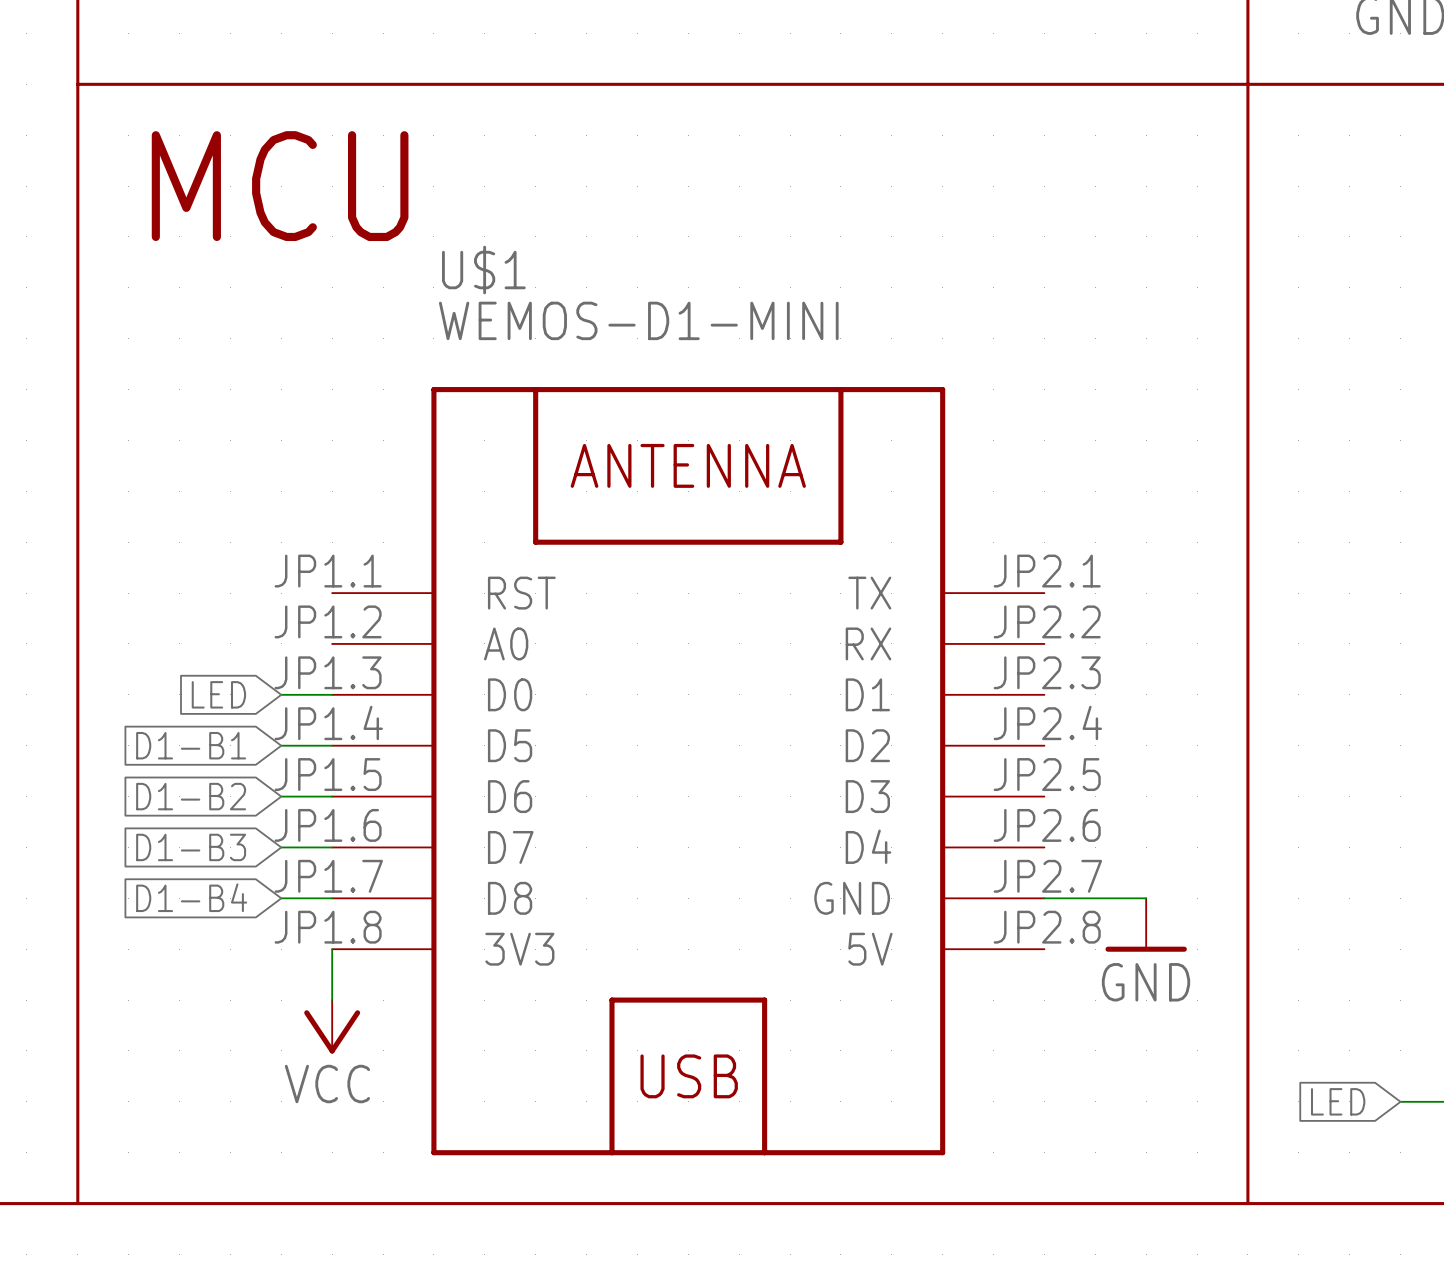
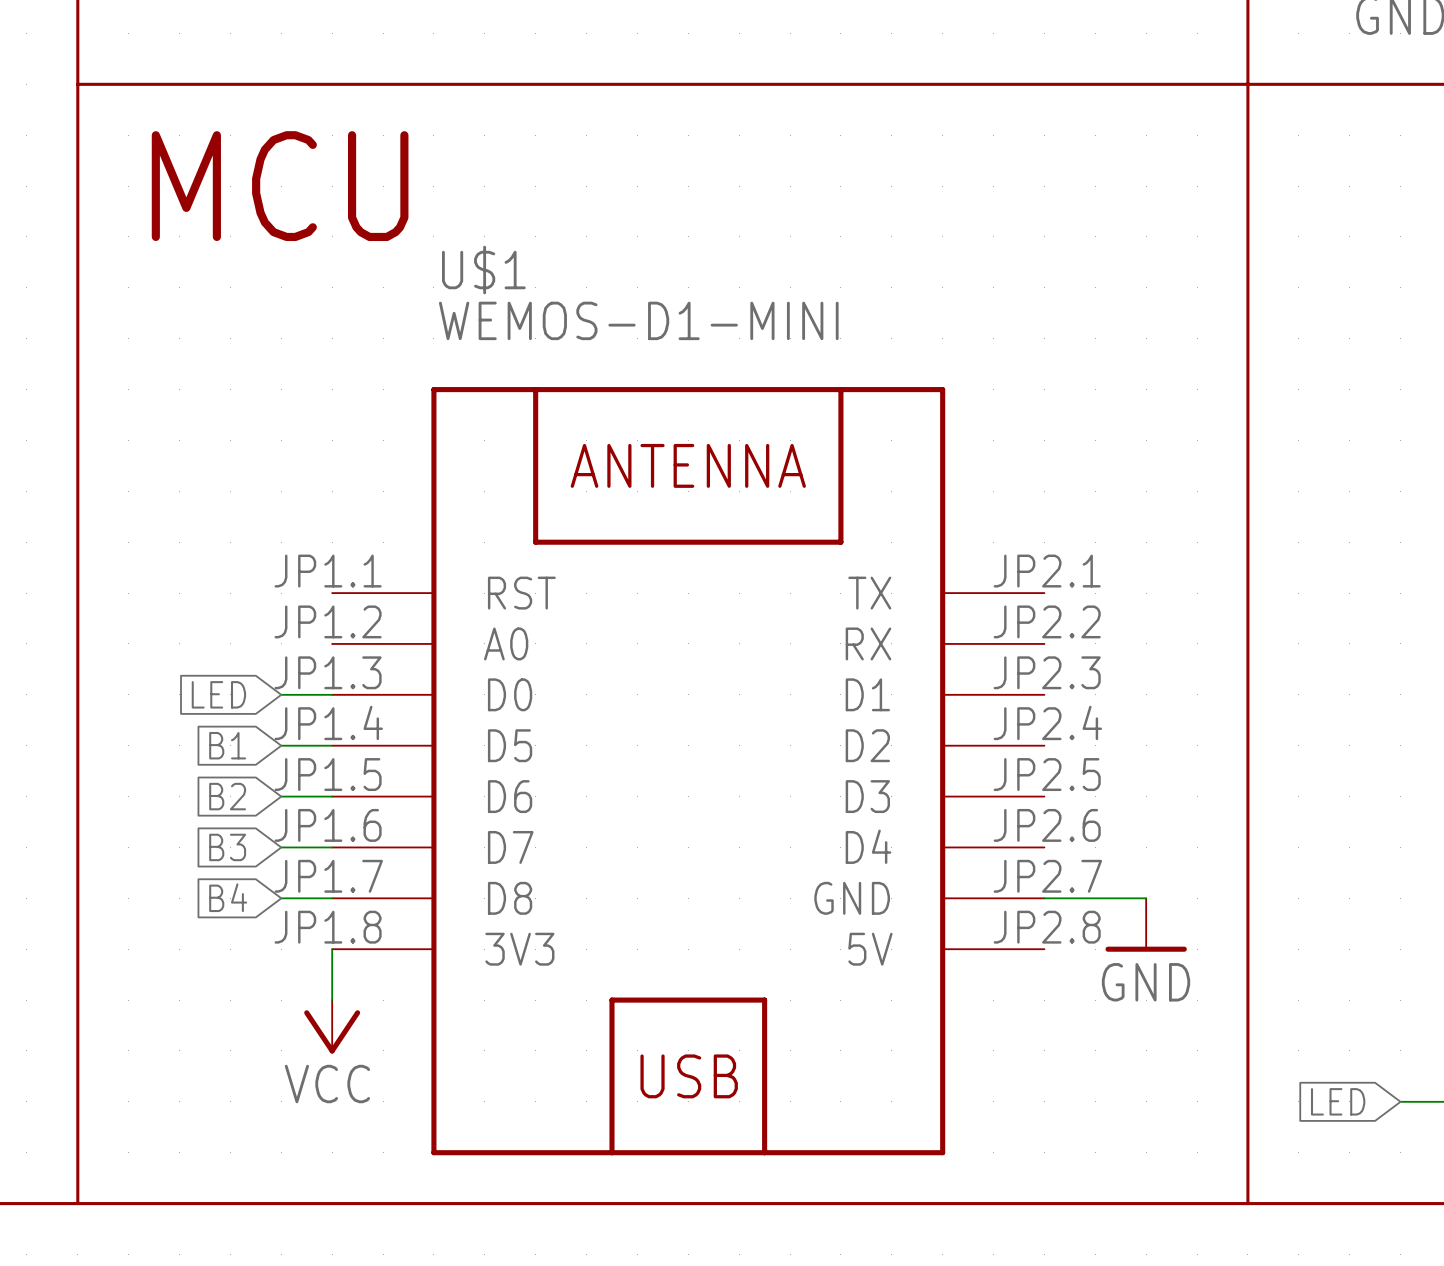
global label: D1-B1 (191, 745) -> B1 (227, 745)
global label: D1-B2 (191, 796) -> B2 (227, 796)
global label: D1-B3 (191, 847) -> B3 (227, 847)
global label: D1-B4 (191, 897) -> B4 (228, 897)

